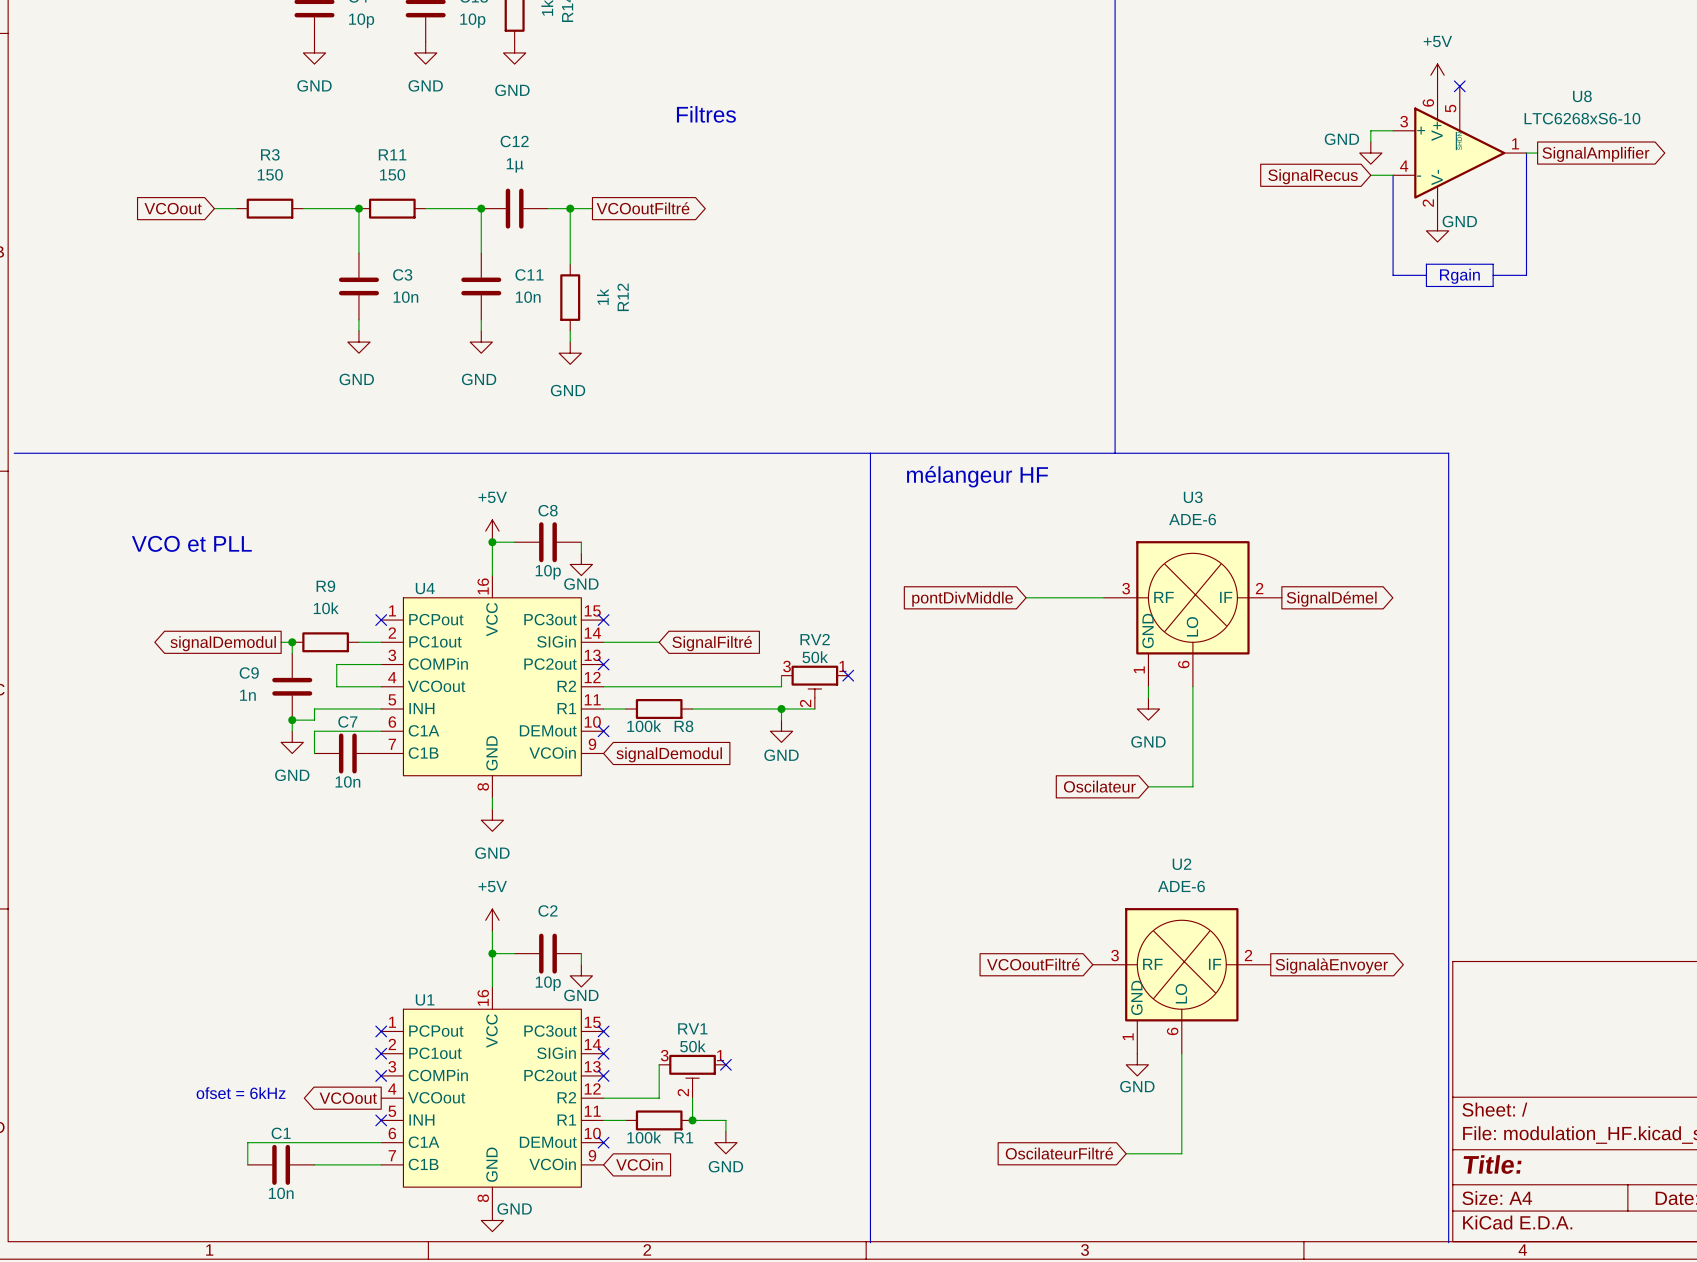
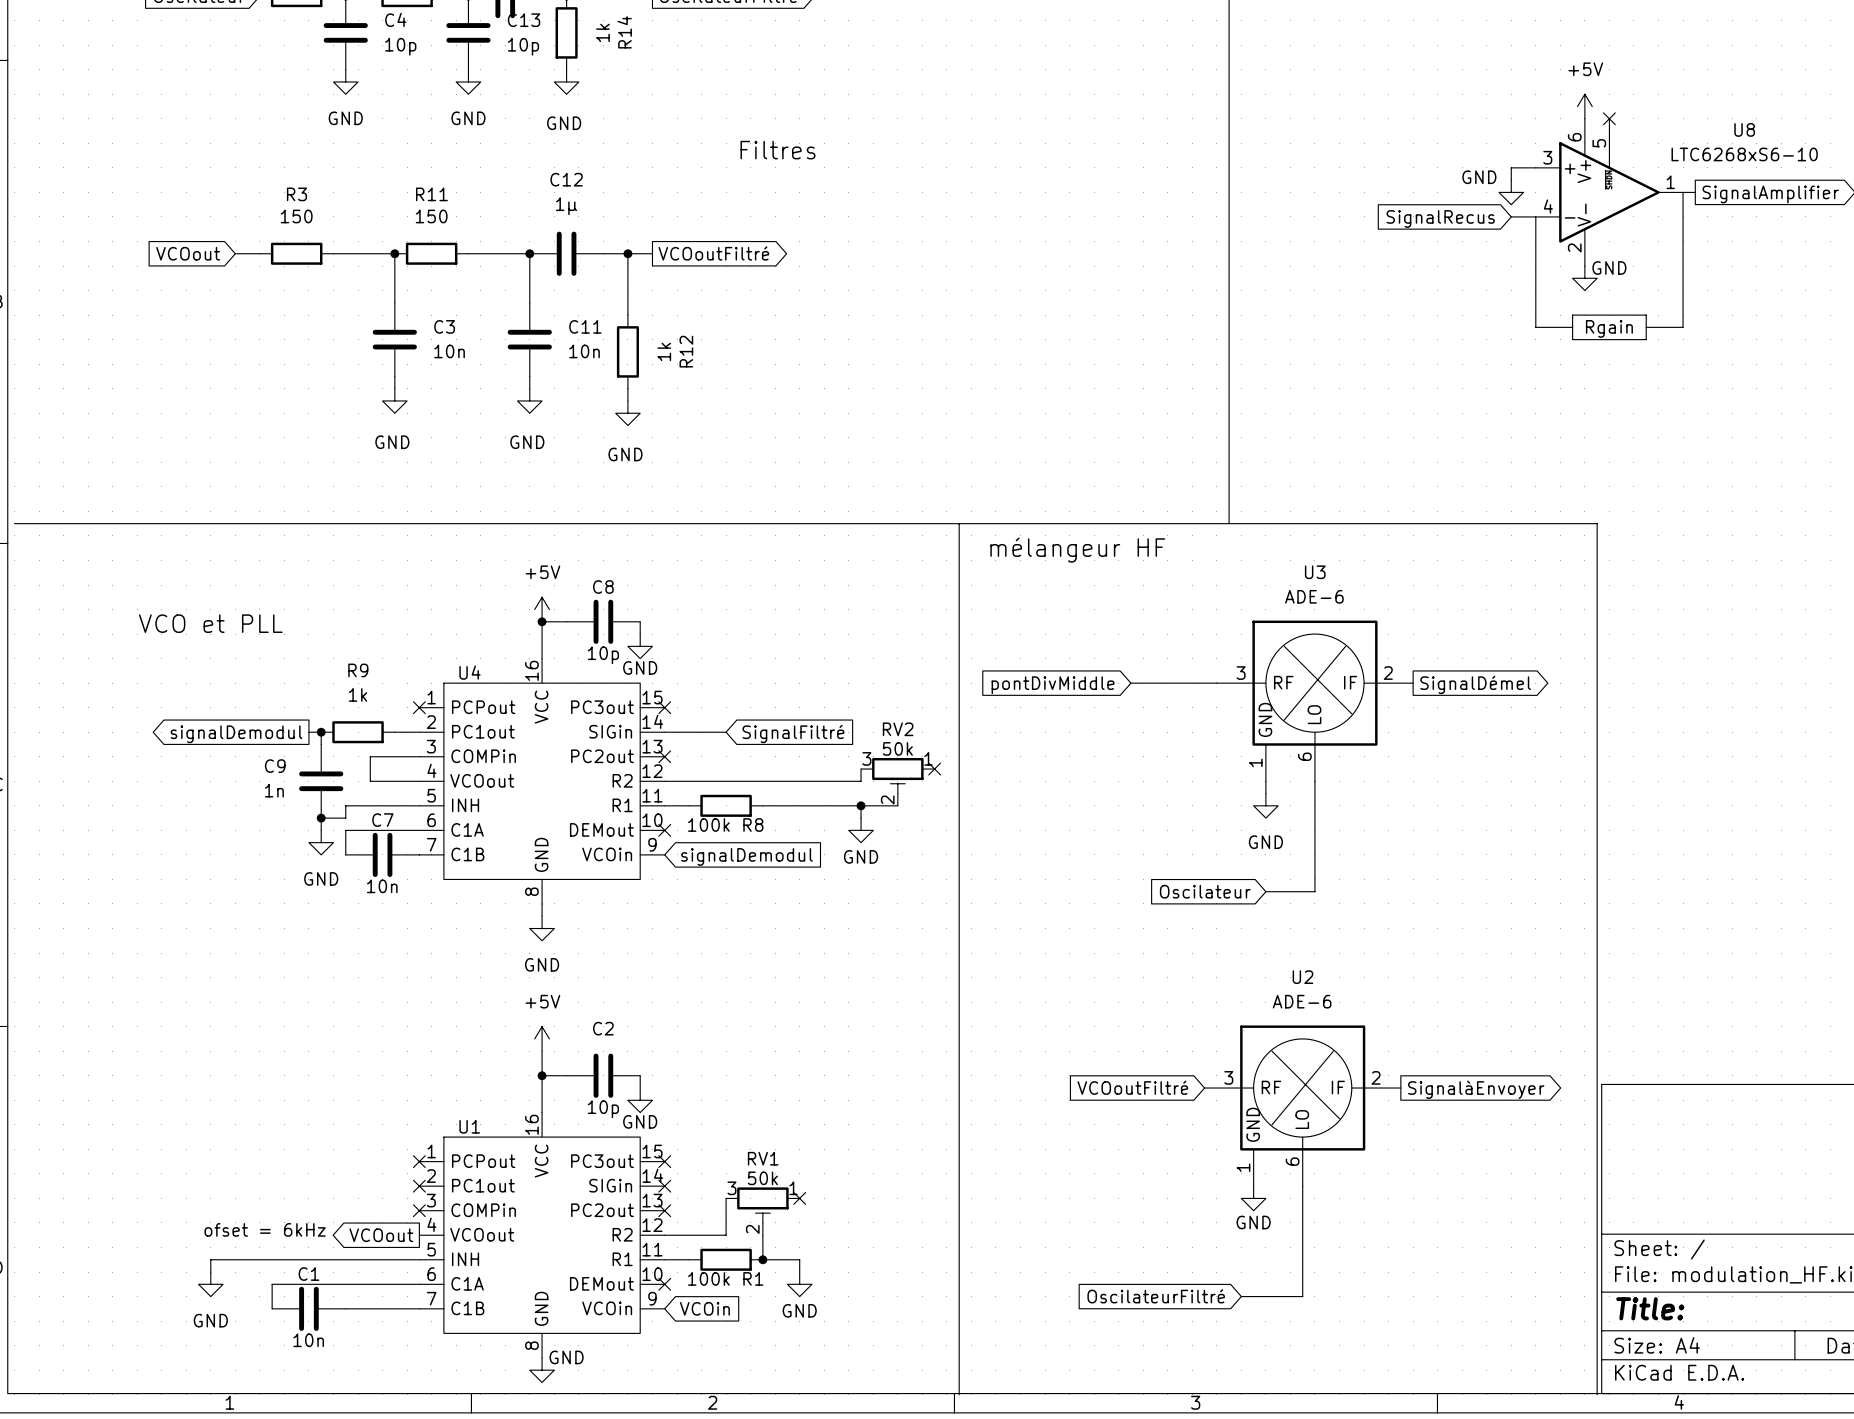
R9 value: 10k (326, 608) -> 1k (358, 694)
wire: none -> (419, 1259) (210, 1259) (210, 1272)
no-connect mark: (381, 1120) -> none
power symbol: none -> GND (210, 1284)

